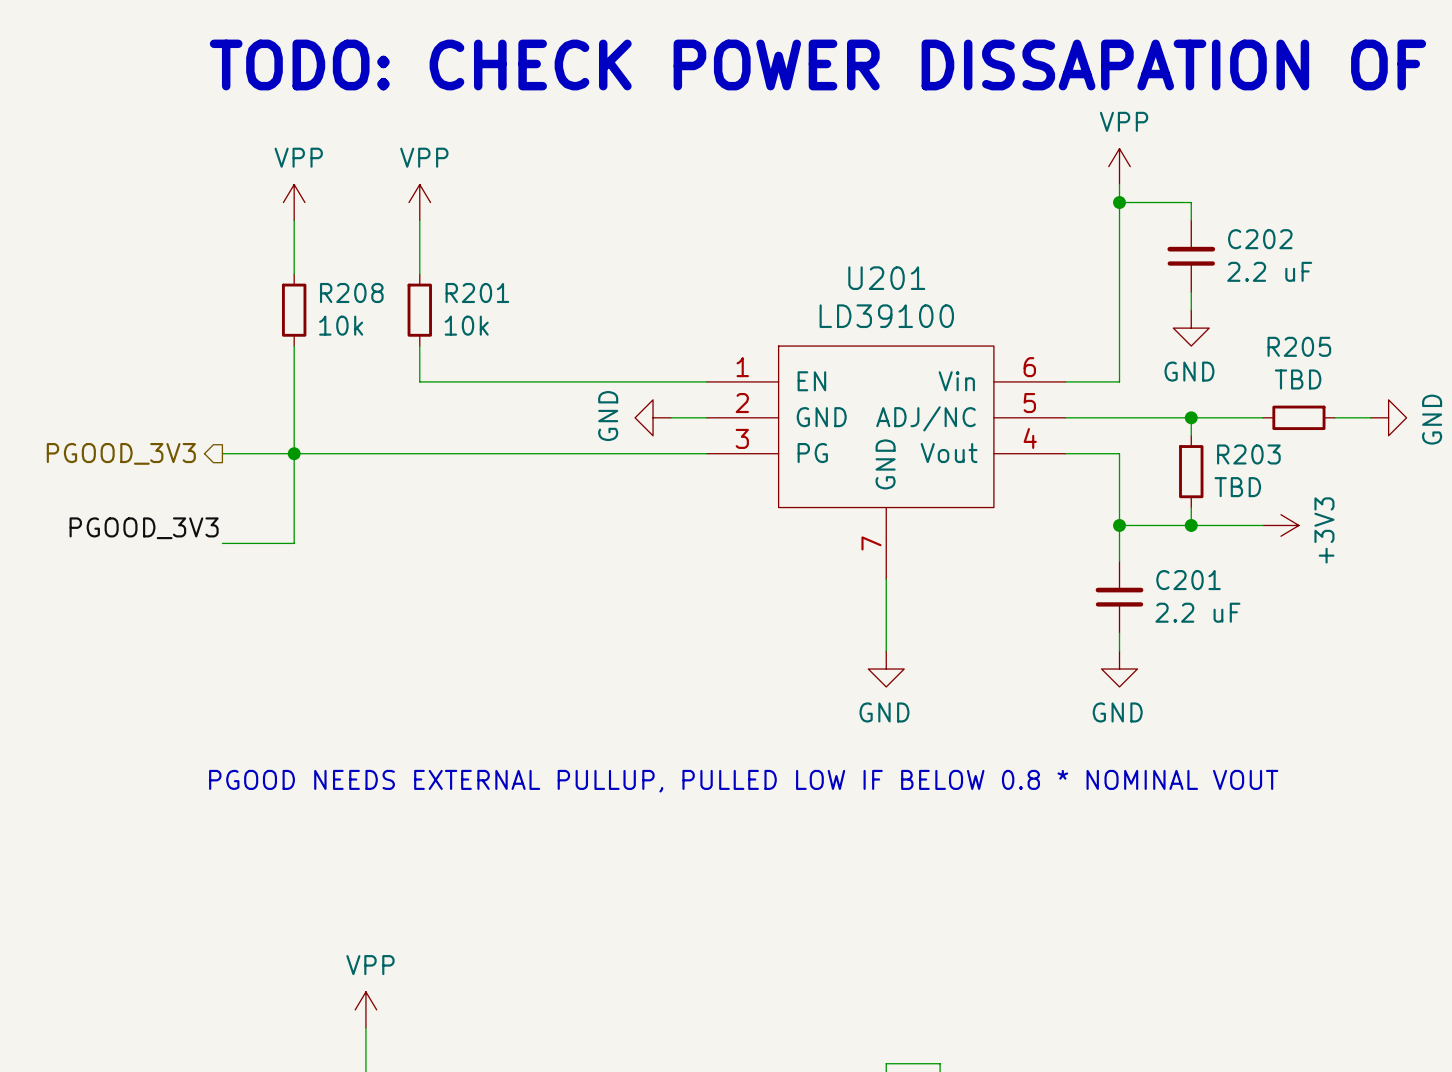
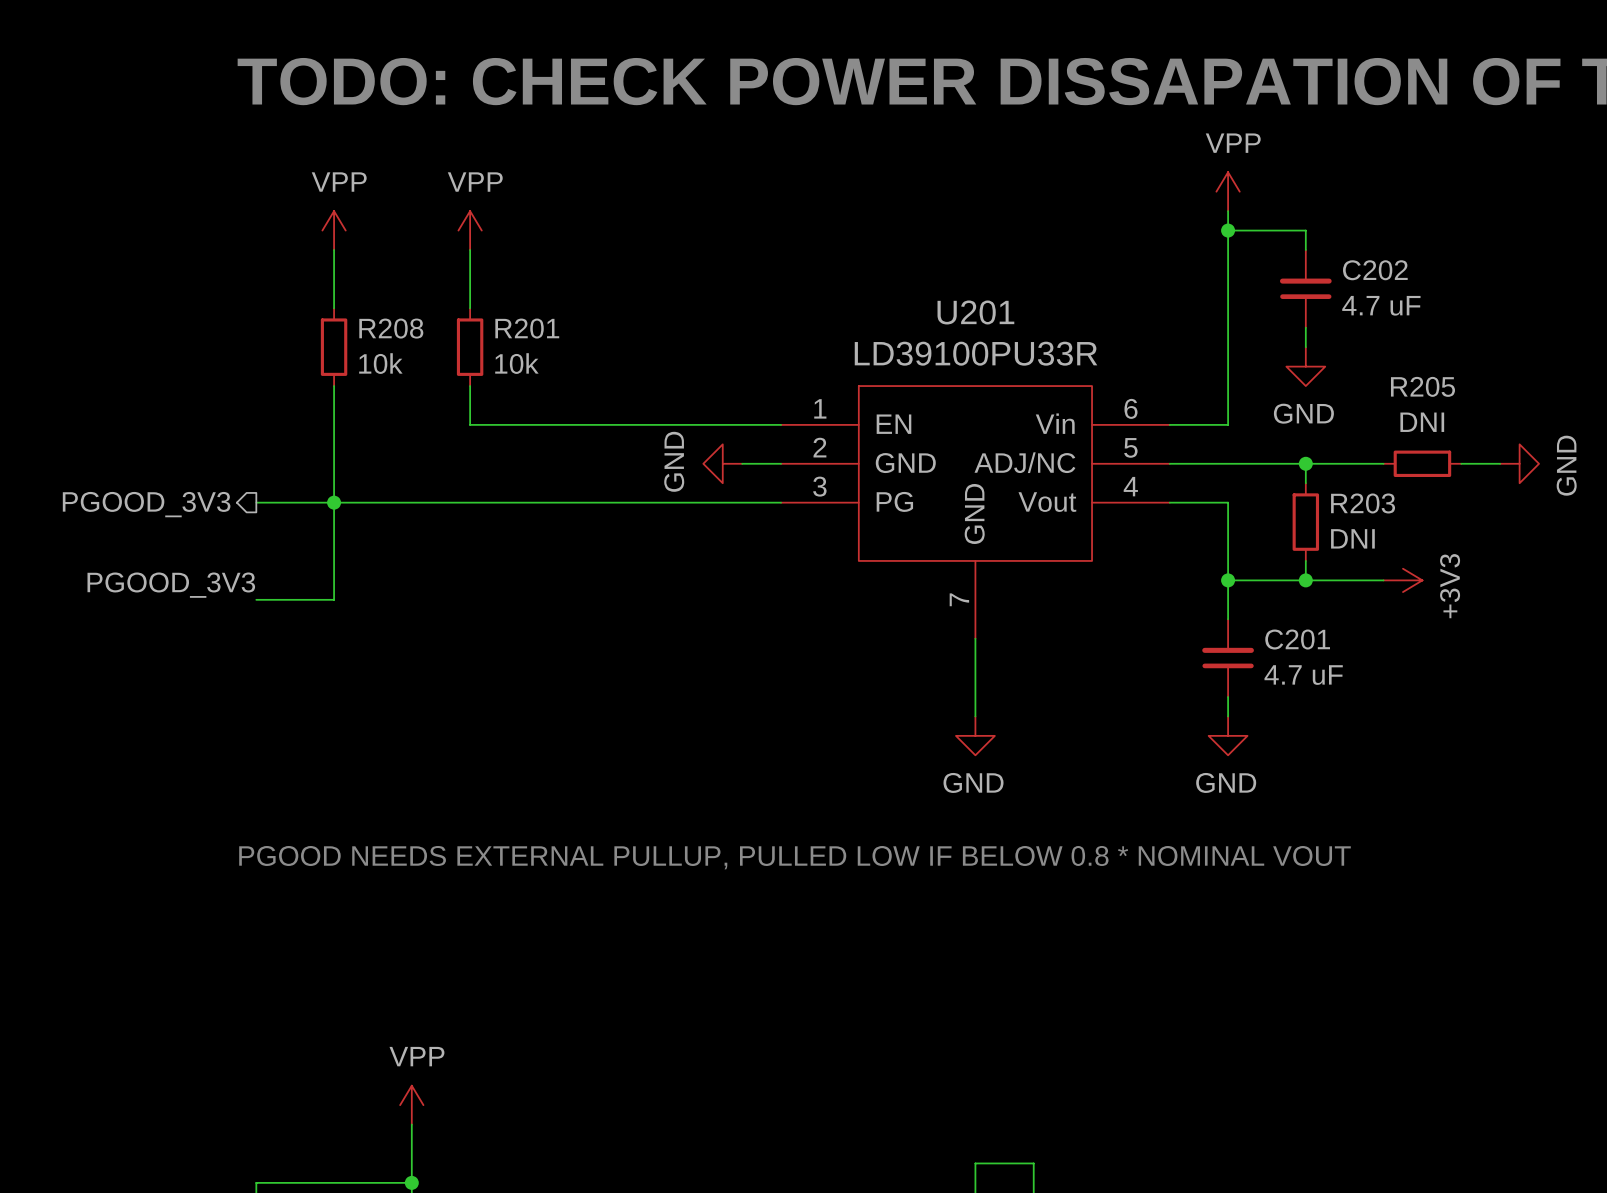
C202 value: 2.2 uF (1269, 271) -> 4.7 uF (1381, 305)
U201 value: LD39100 (886, 316) -> LD39100PU33R (976, 353)
R205 value: TBD (1298, 379) -> DNI (1422, 422)
R203 value: TBD (1237, 487) -> DNI (1352, 538)
C201 value: 2.2 uF (1197, 612) -> 4.7 uF (1303, 675)

